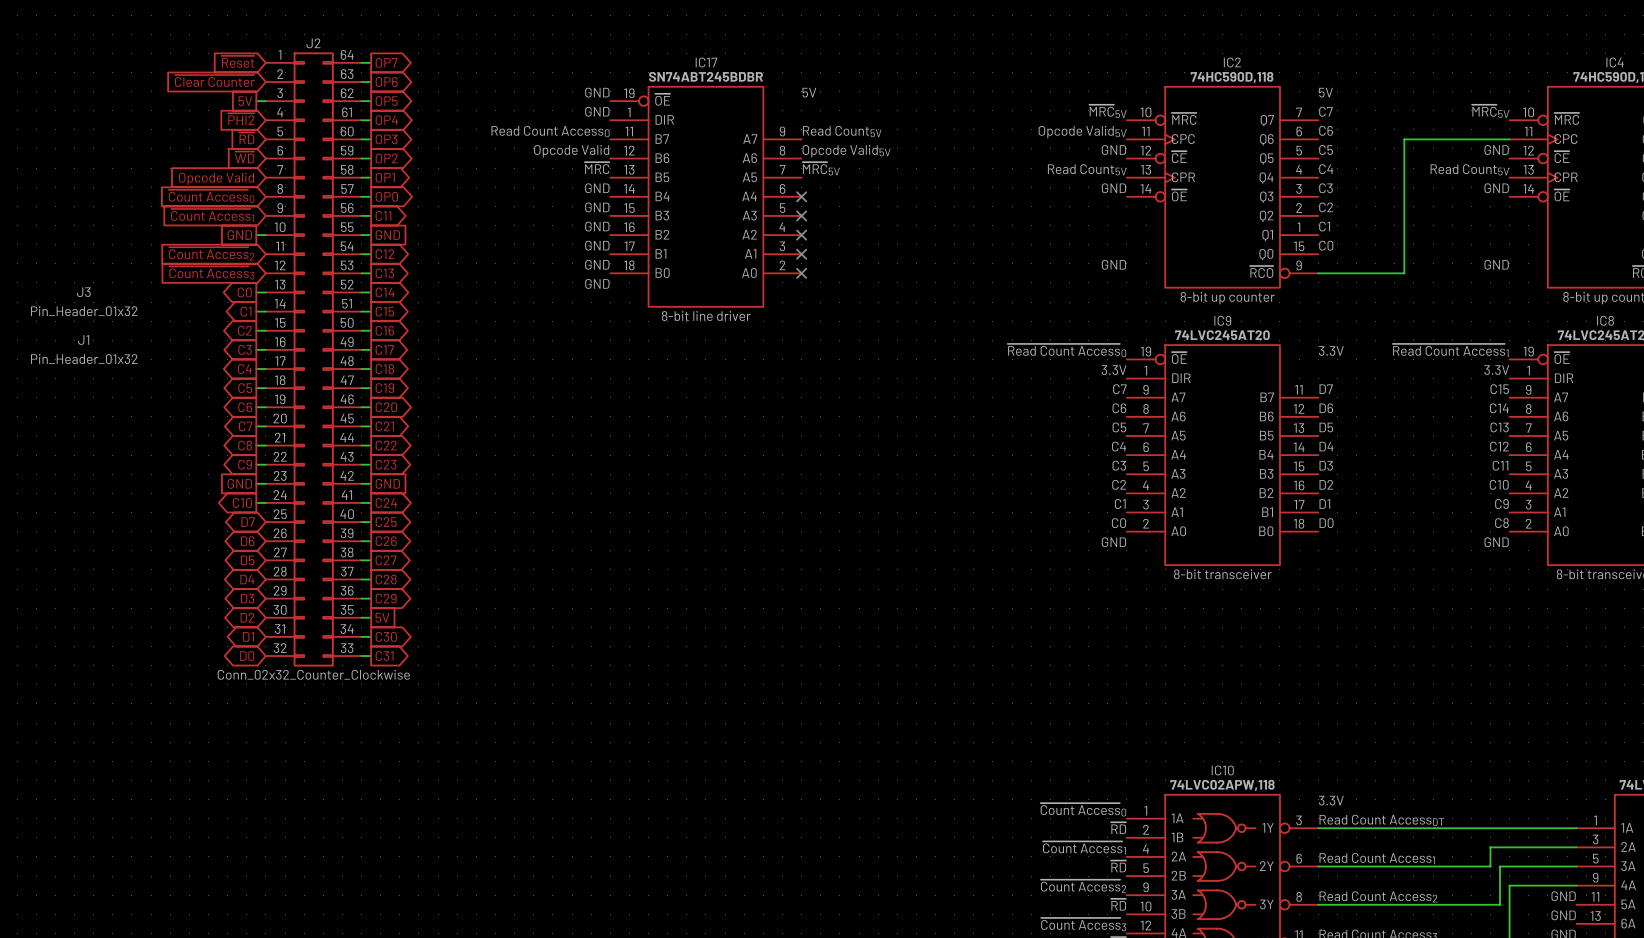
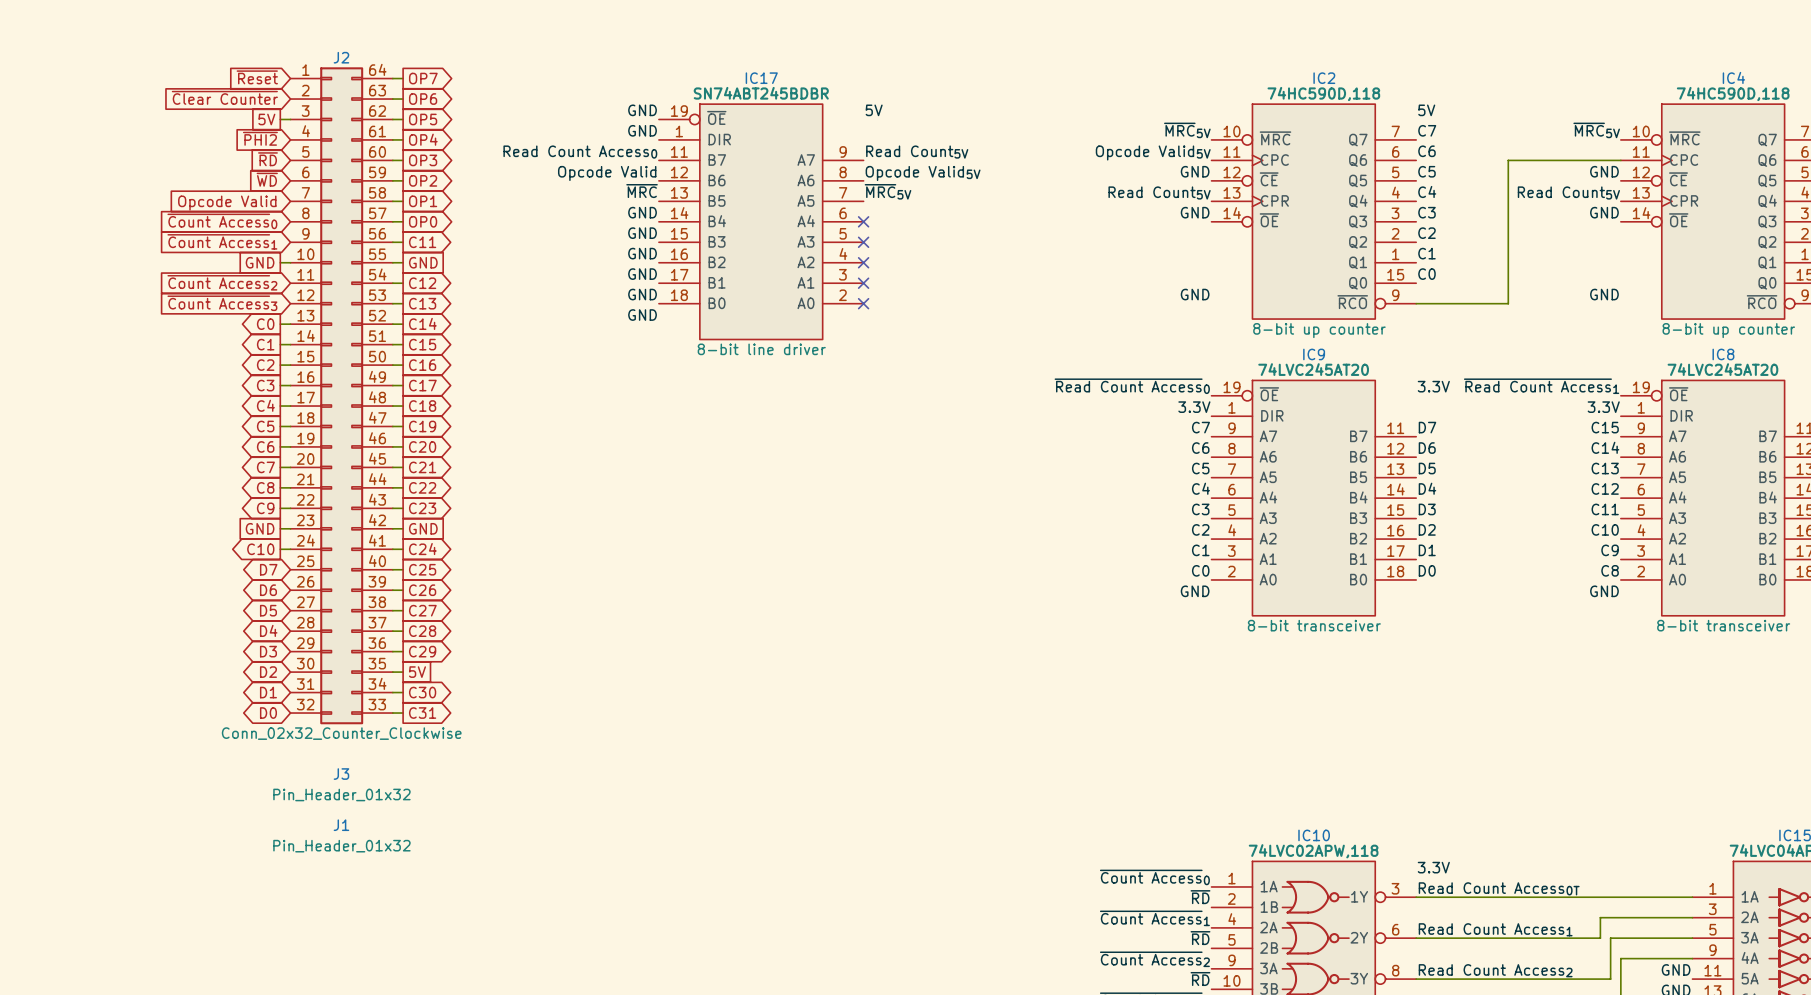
J3 position: (84, 301) -> (341, 784)
J1 position: (84, 349) -> (341, 835)

